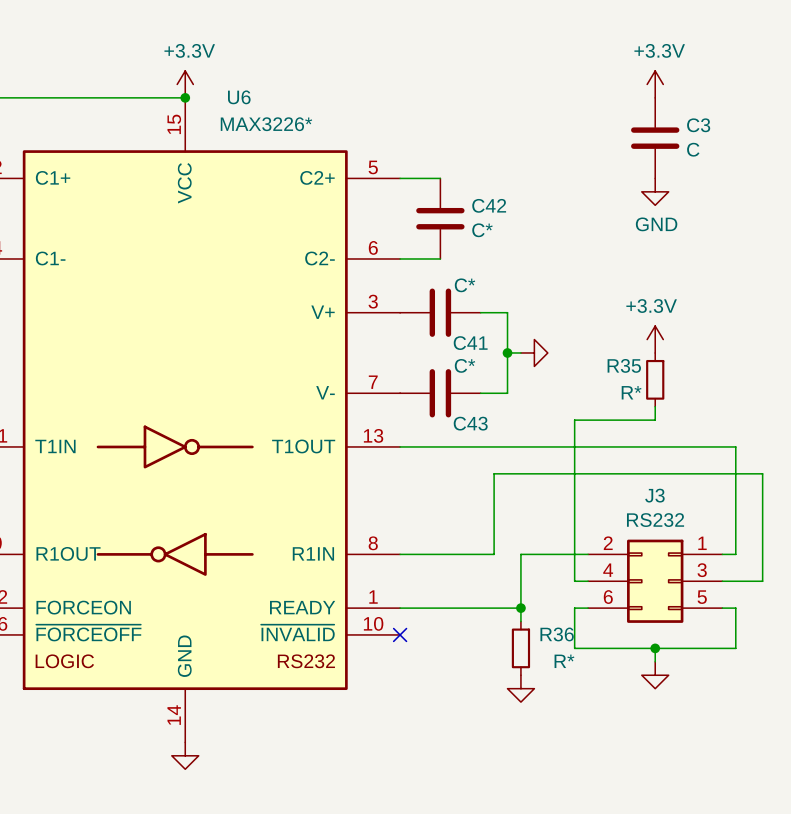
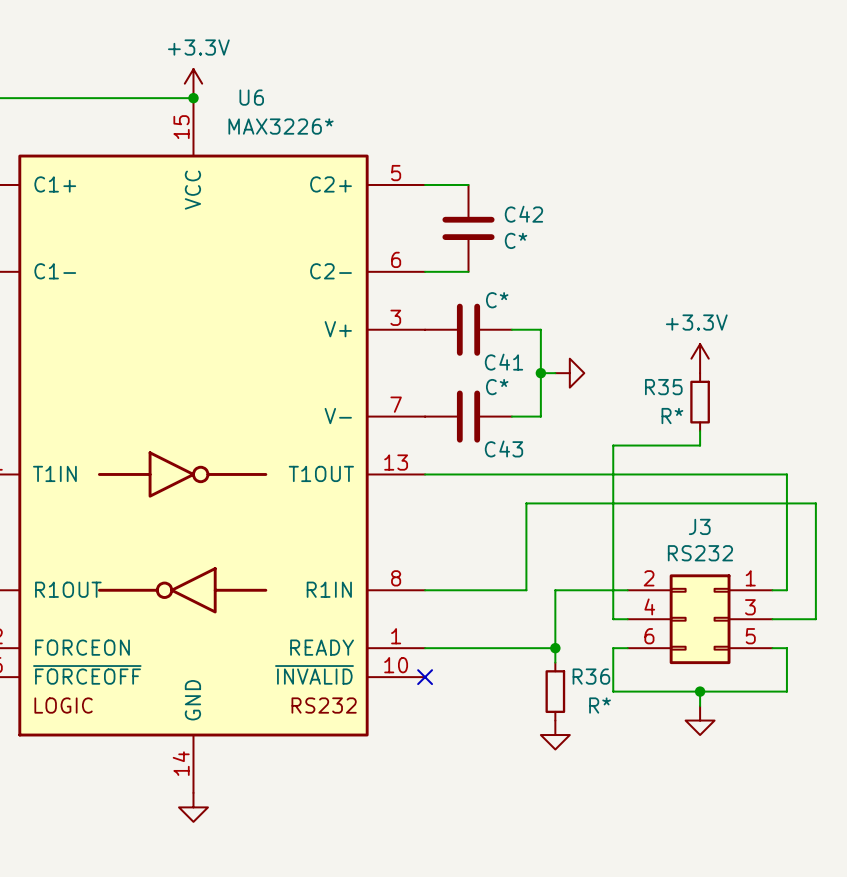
power symbol: +3.3V (655, 84) -> none
C3: C (655, 138) -> none
power symbol: GND (655, 191) -> none

